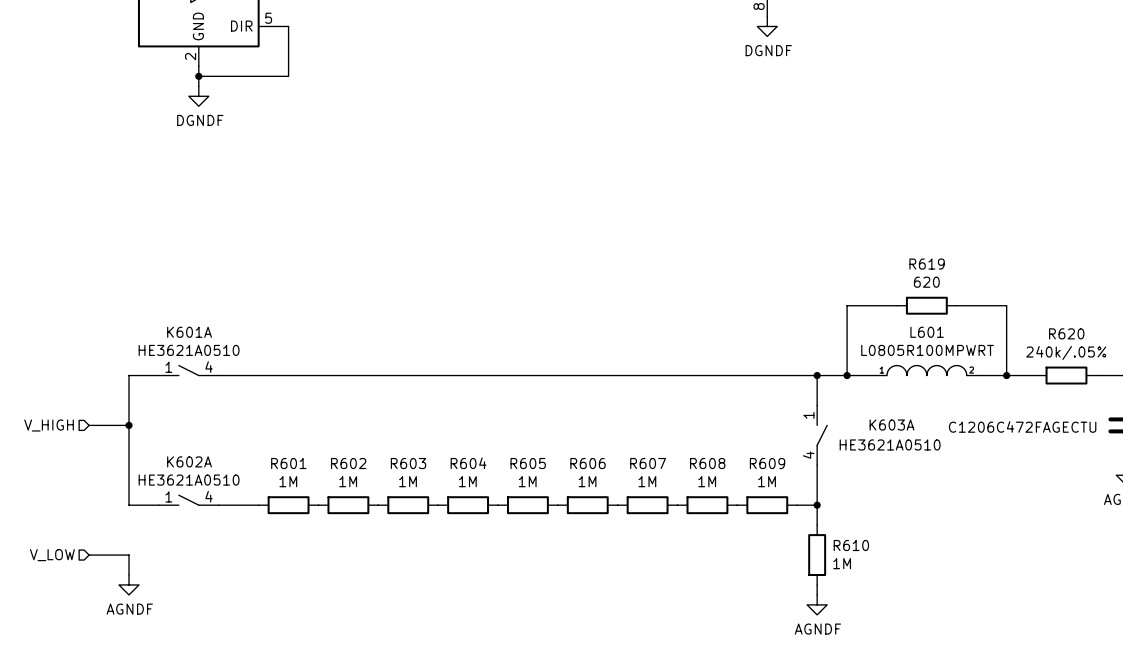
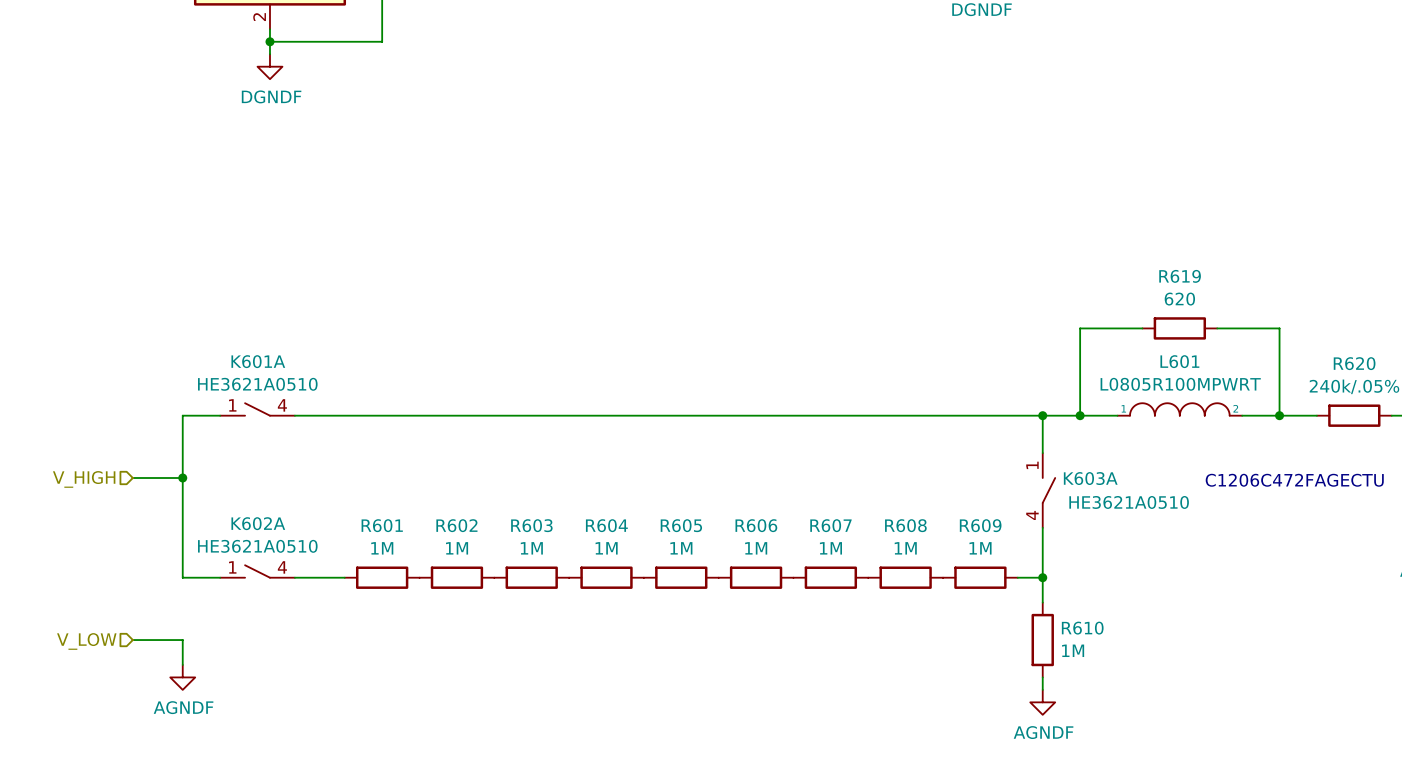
K603A name position: K603A (892, 425) -> K603A (1090, 478)

